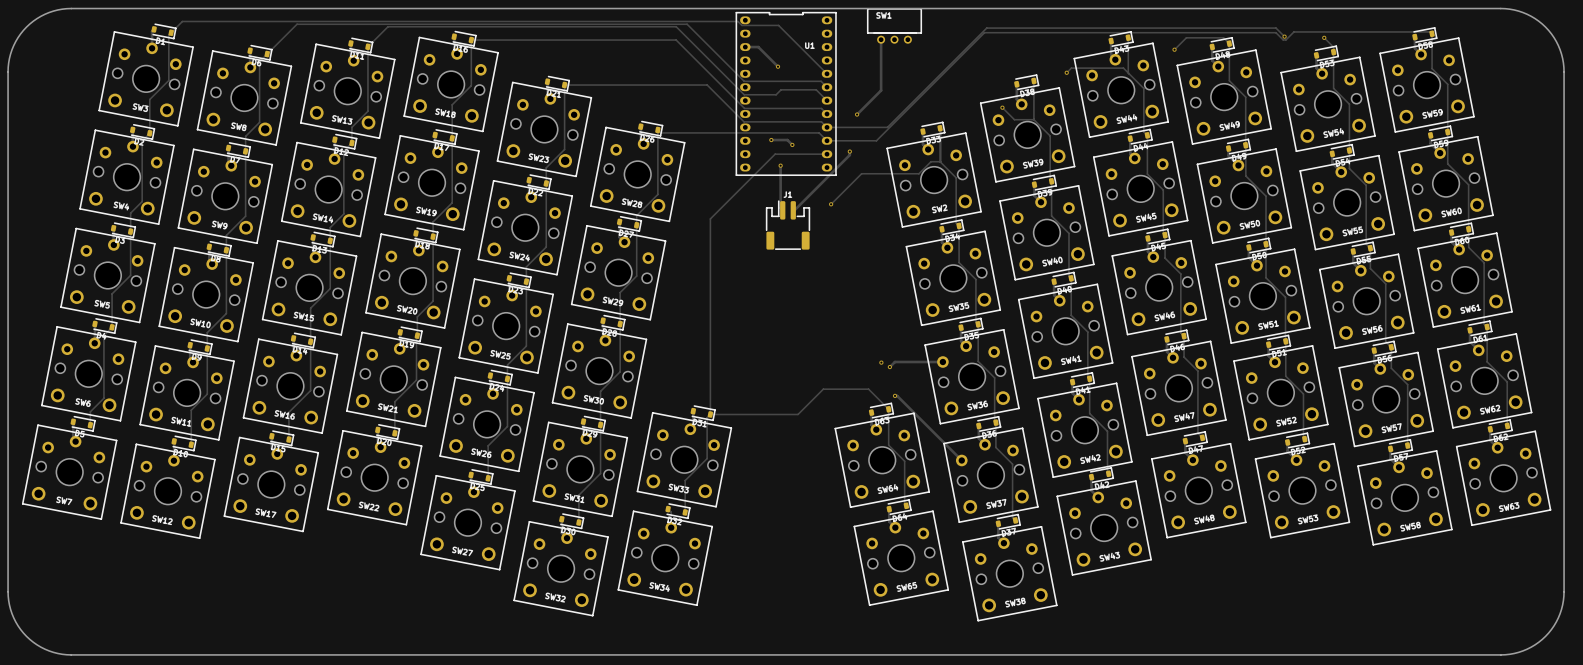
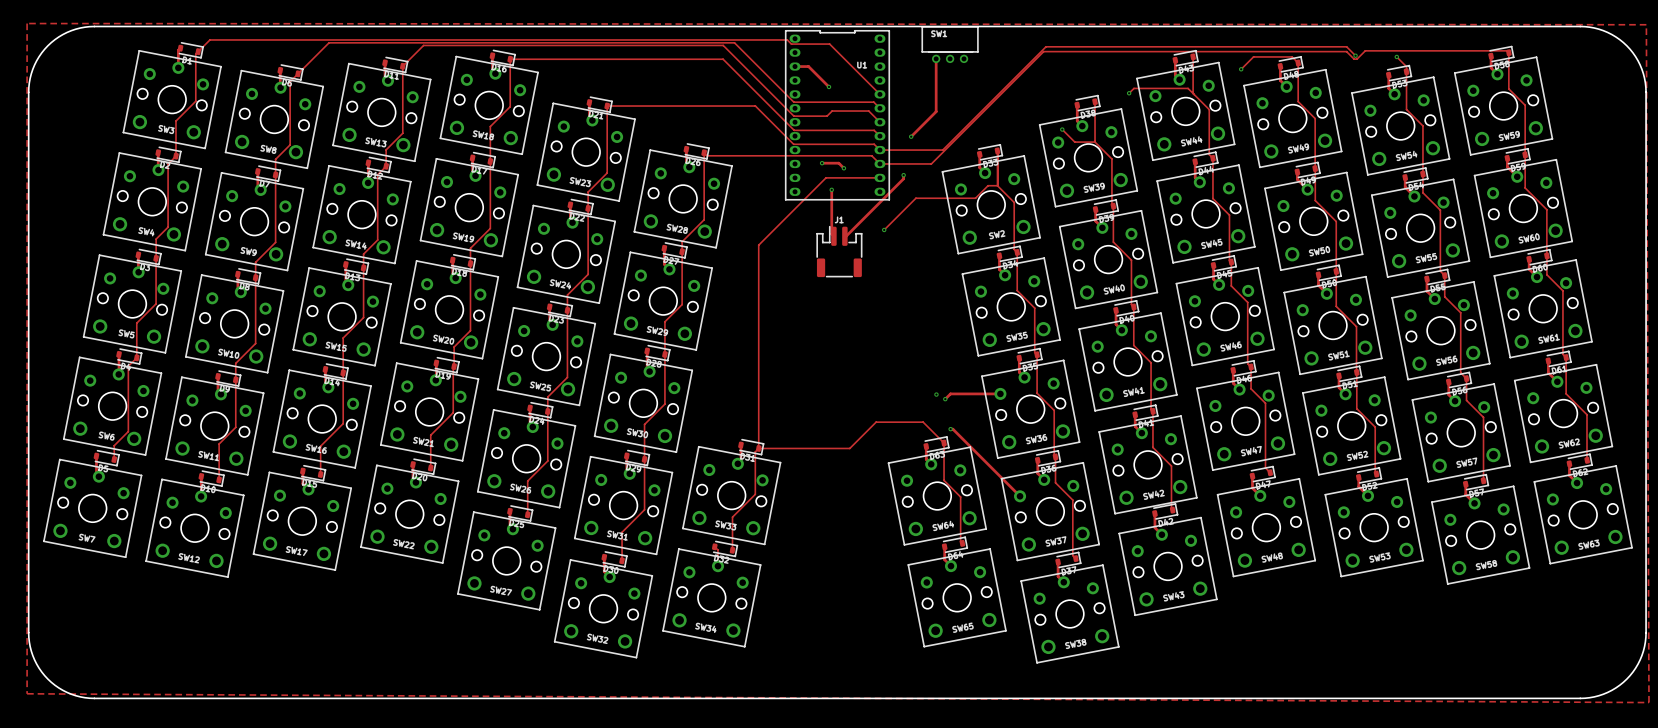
zone outline: none -> (27, 23) (1646, 24) (1648, 702) (27, 693) (27, 23)

